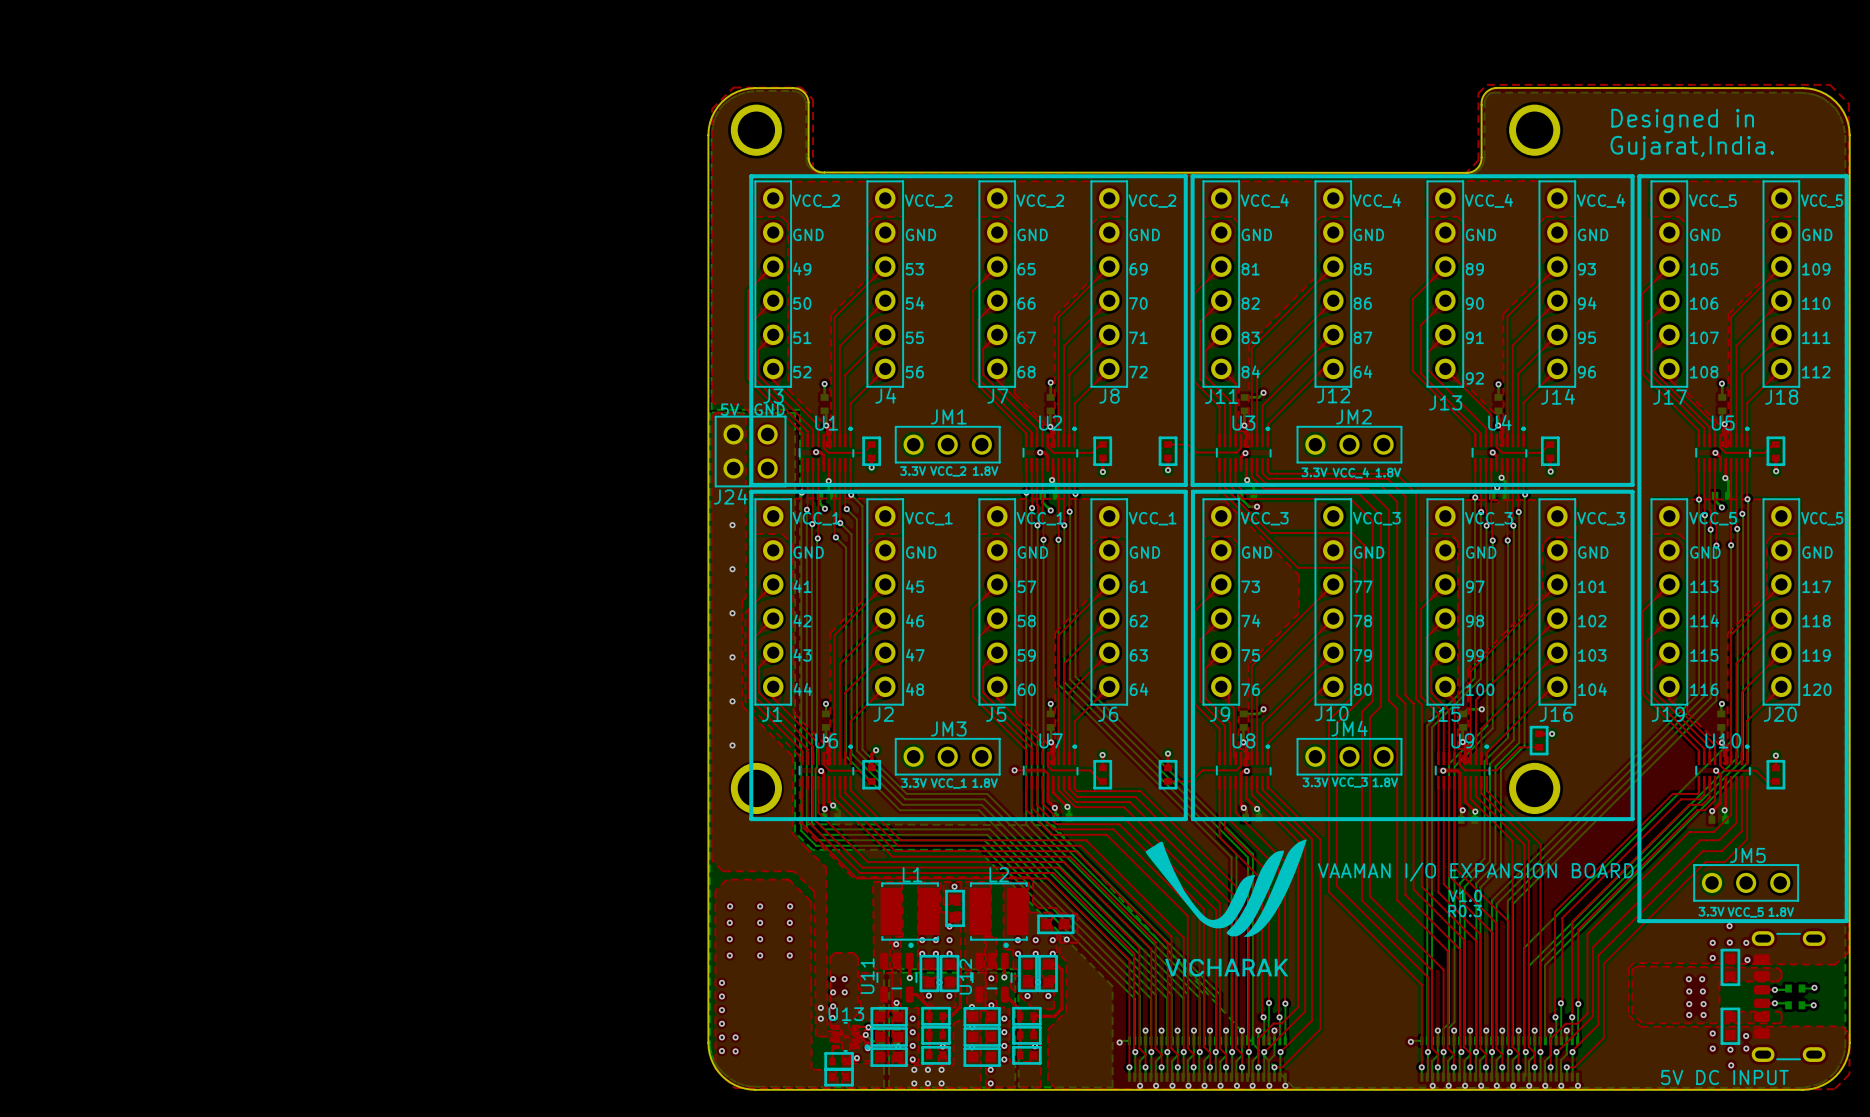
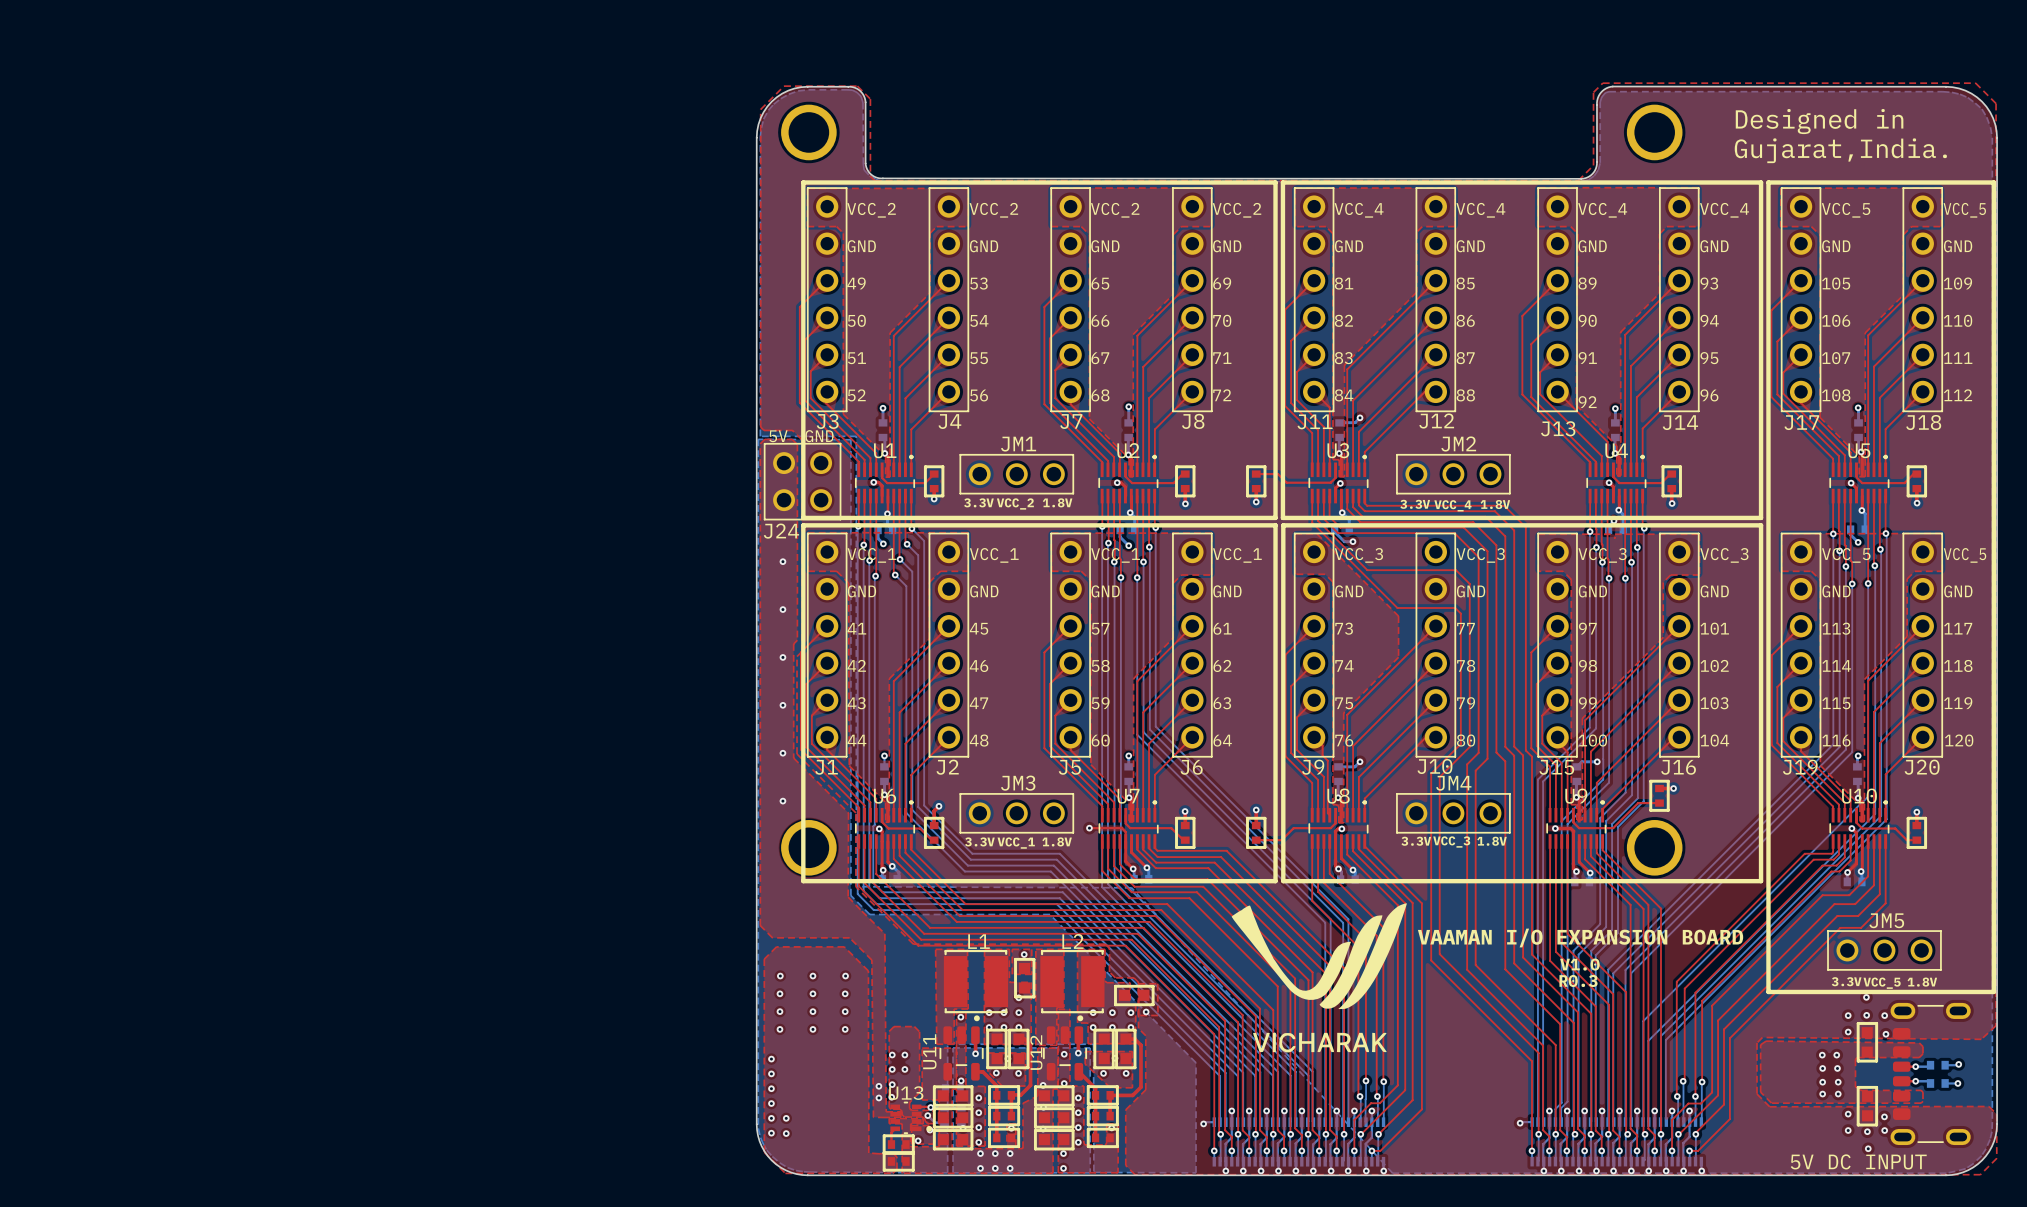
text: 64 (1363, 371) -> 88 (1465, 395)

